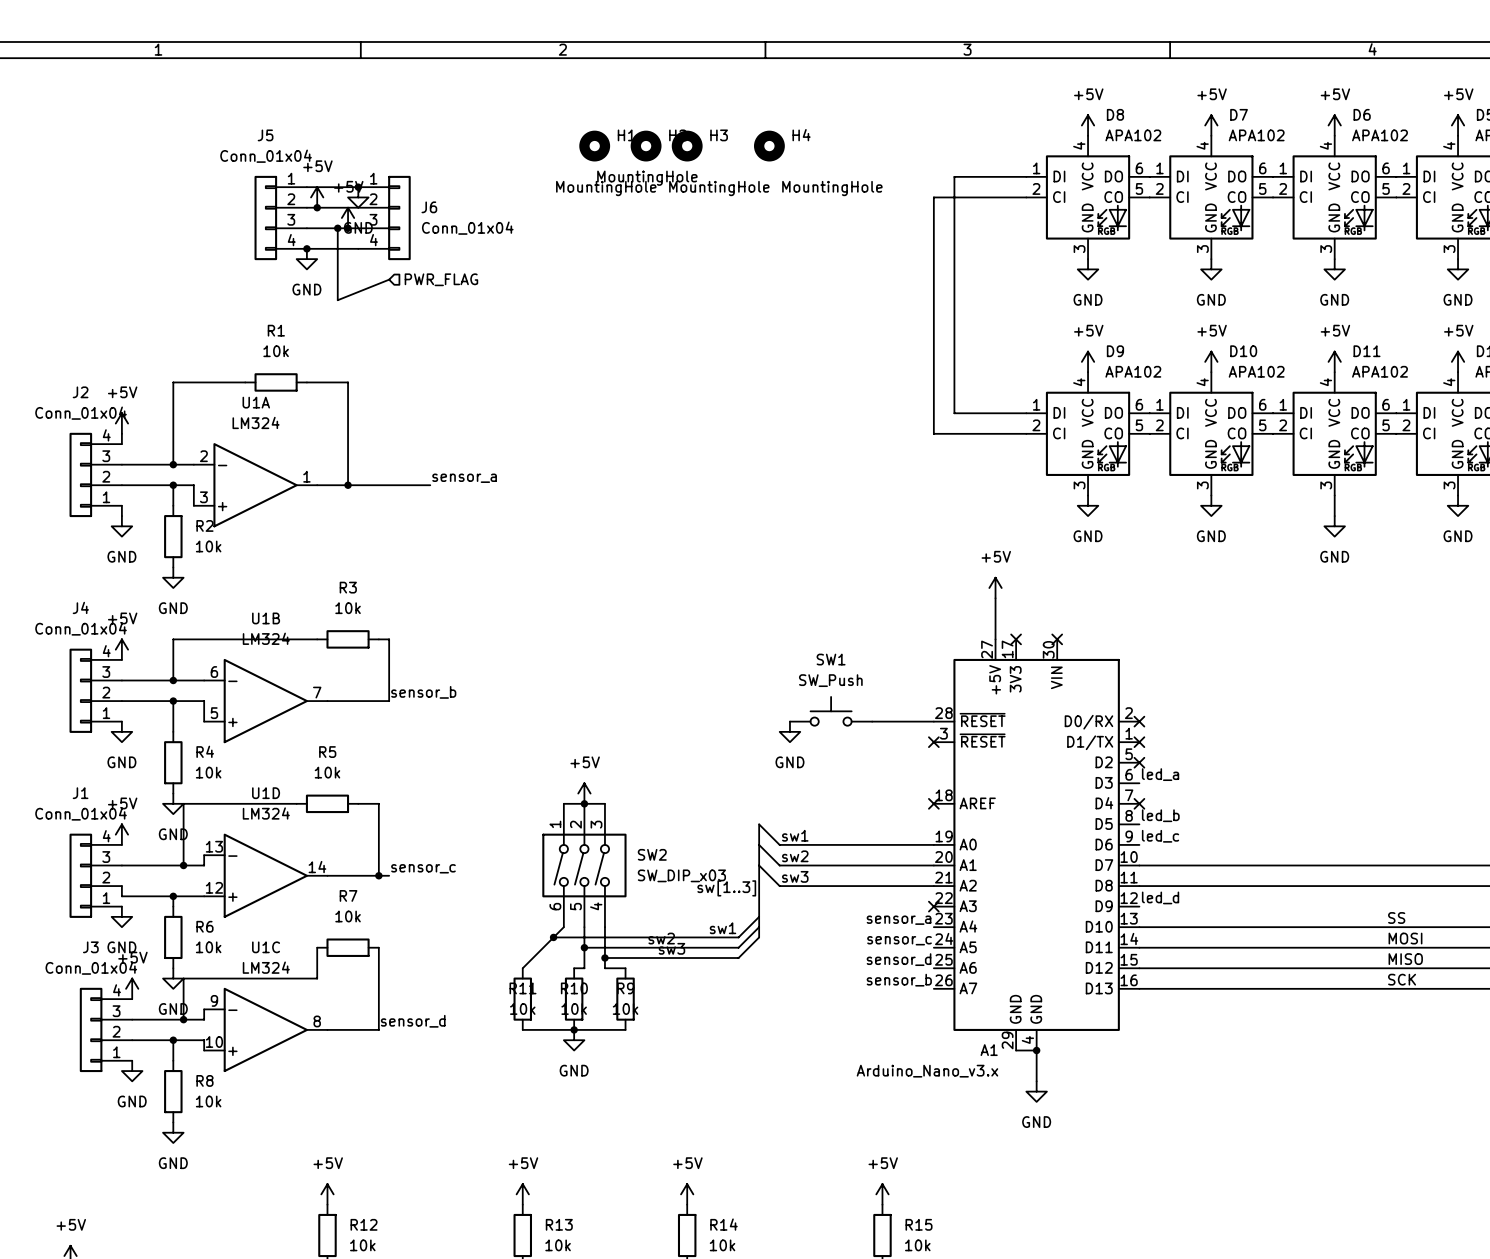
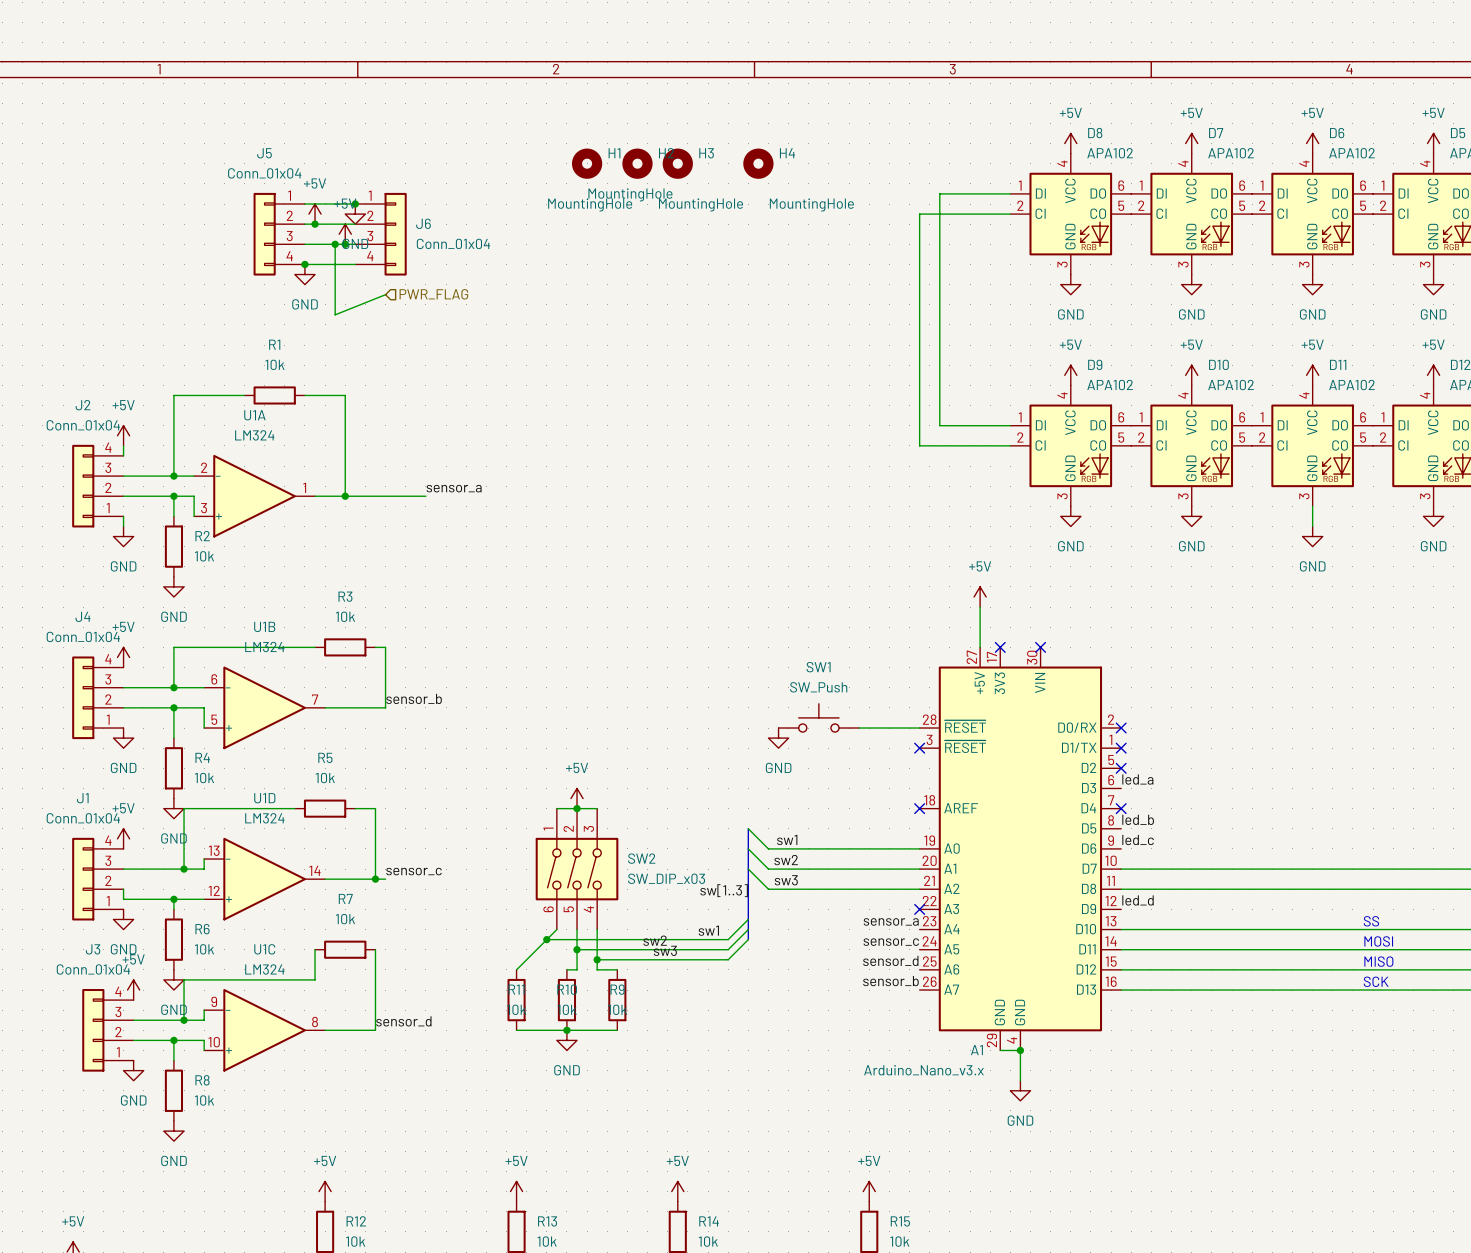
label: SS (1396, 917) -> none
text: none -> SS (1371, 921)
label: MOSI (1405, 938) -> none
text: none -> MOSI (1378, 941)
label: MISO (1405, 959) -> none
text: none -> MISO (1378, 961)
label: SCK (1402, 979) -> none
text: none -> SCK (1376, 981)

